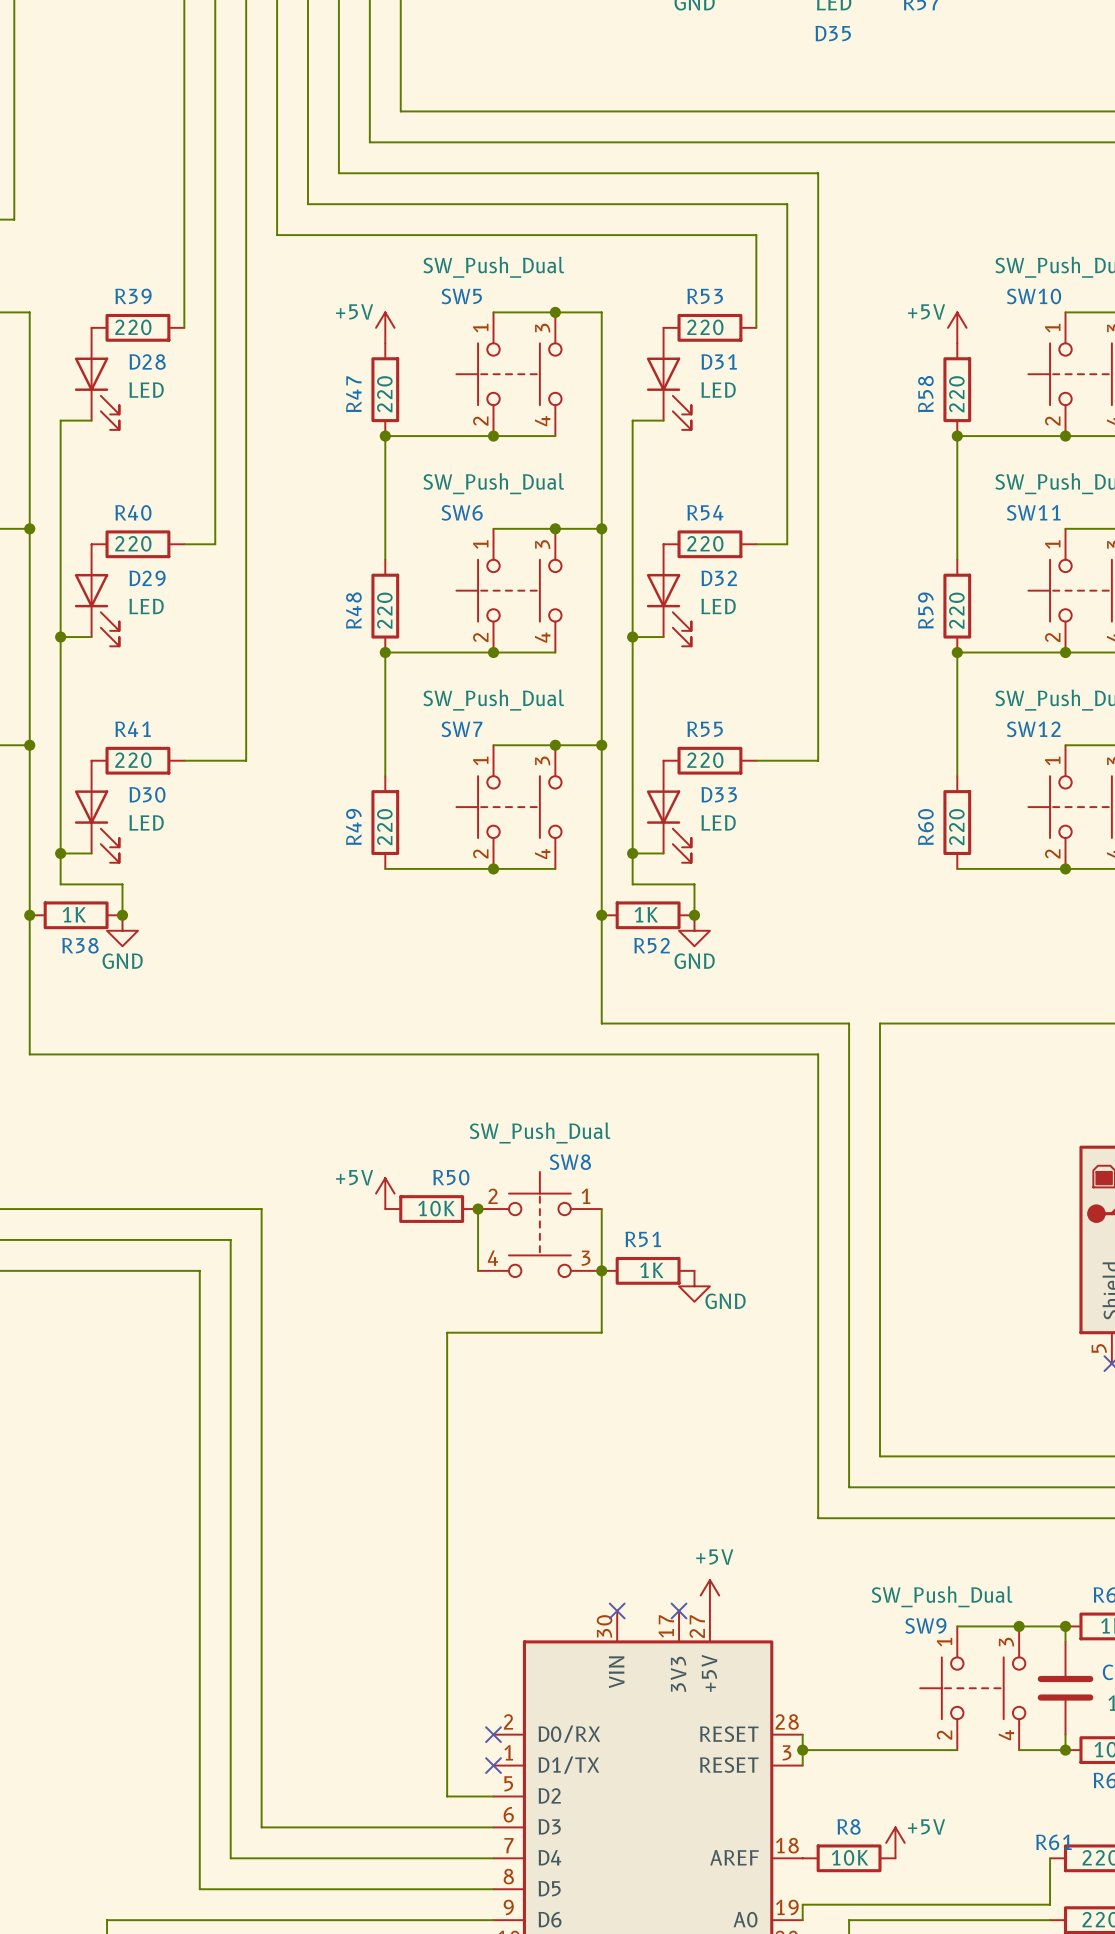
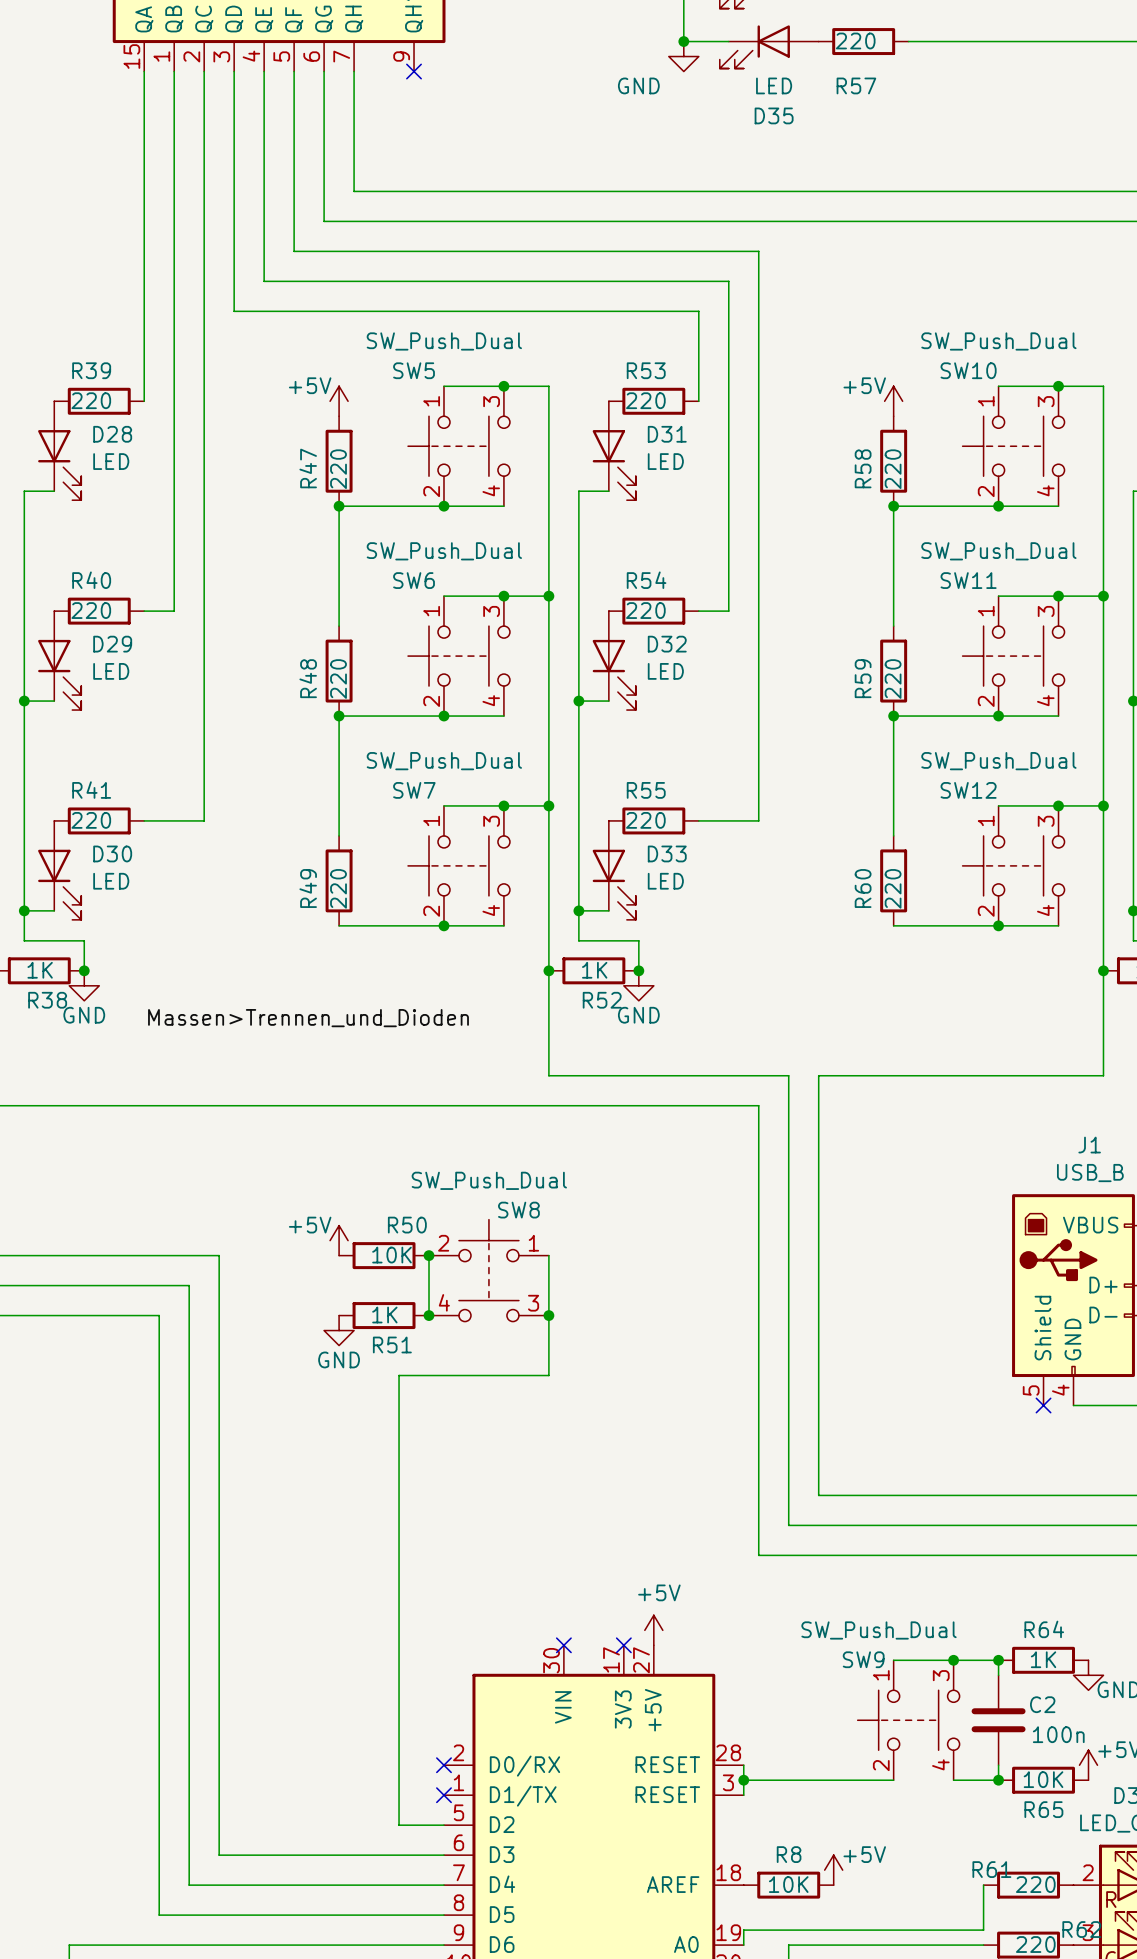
label: none -> Massen>Trennen_und_Dioden (308, 1018)
R51 name position: R51 (643, 1239) -> R51 (392, 1344)
junction: none -> (429, 1315)
R51 position: (648, 1270) -> (384, 1315)
R51 value position: 1K (651, 1270) -> 1K (384, 1315)
power symbol: none -> GND (339, 1330)
power symbol: GND (694, 1286) -> none

